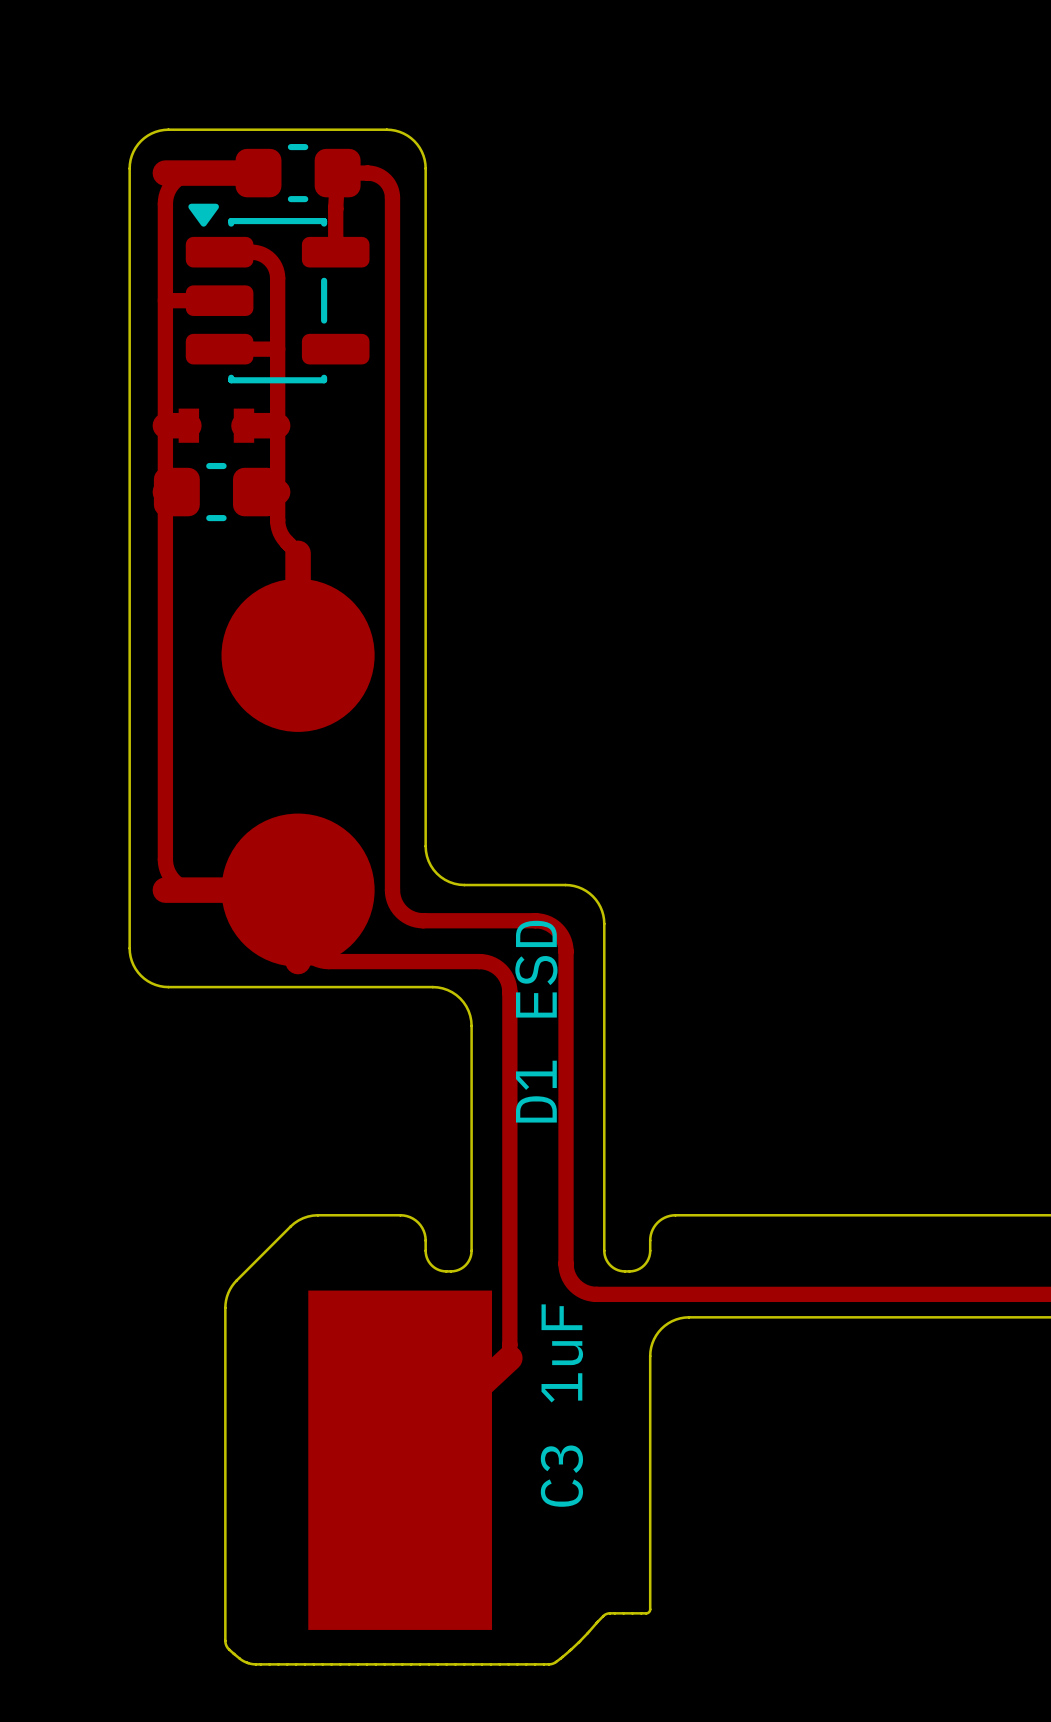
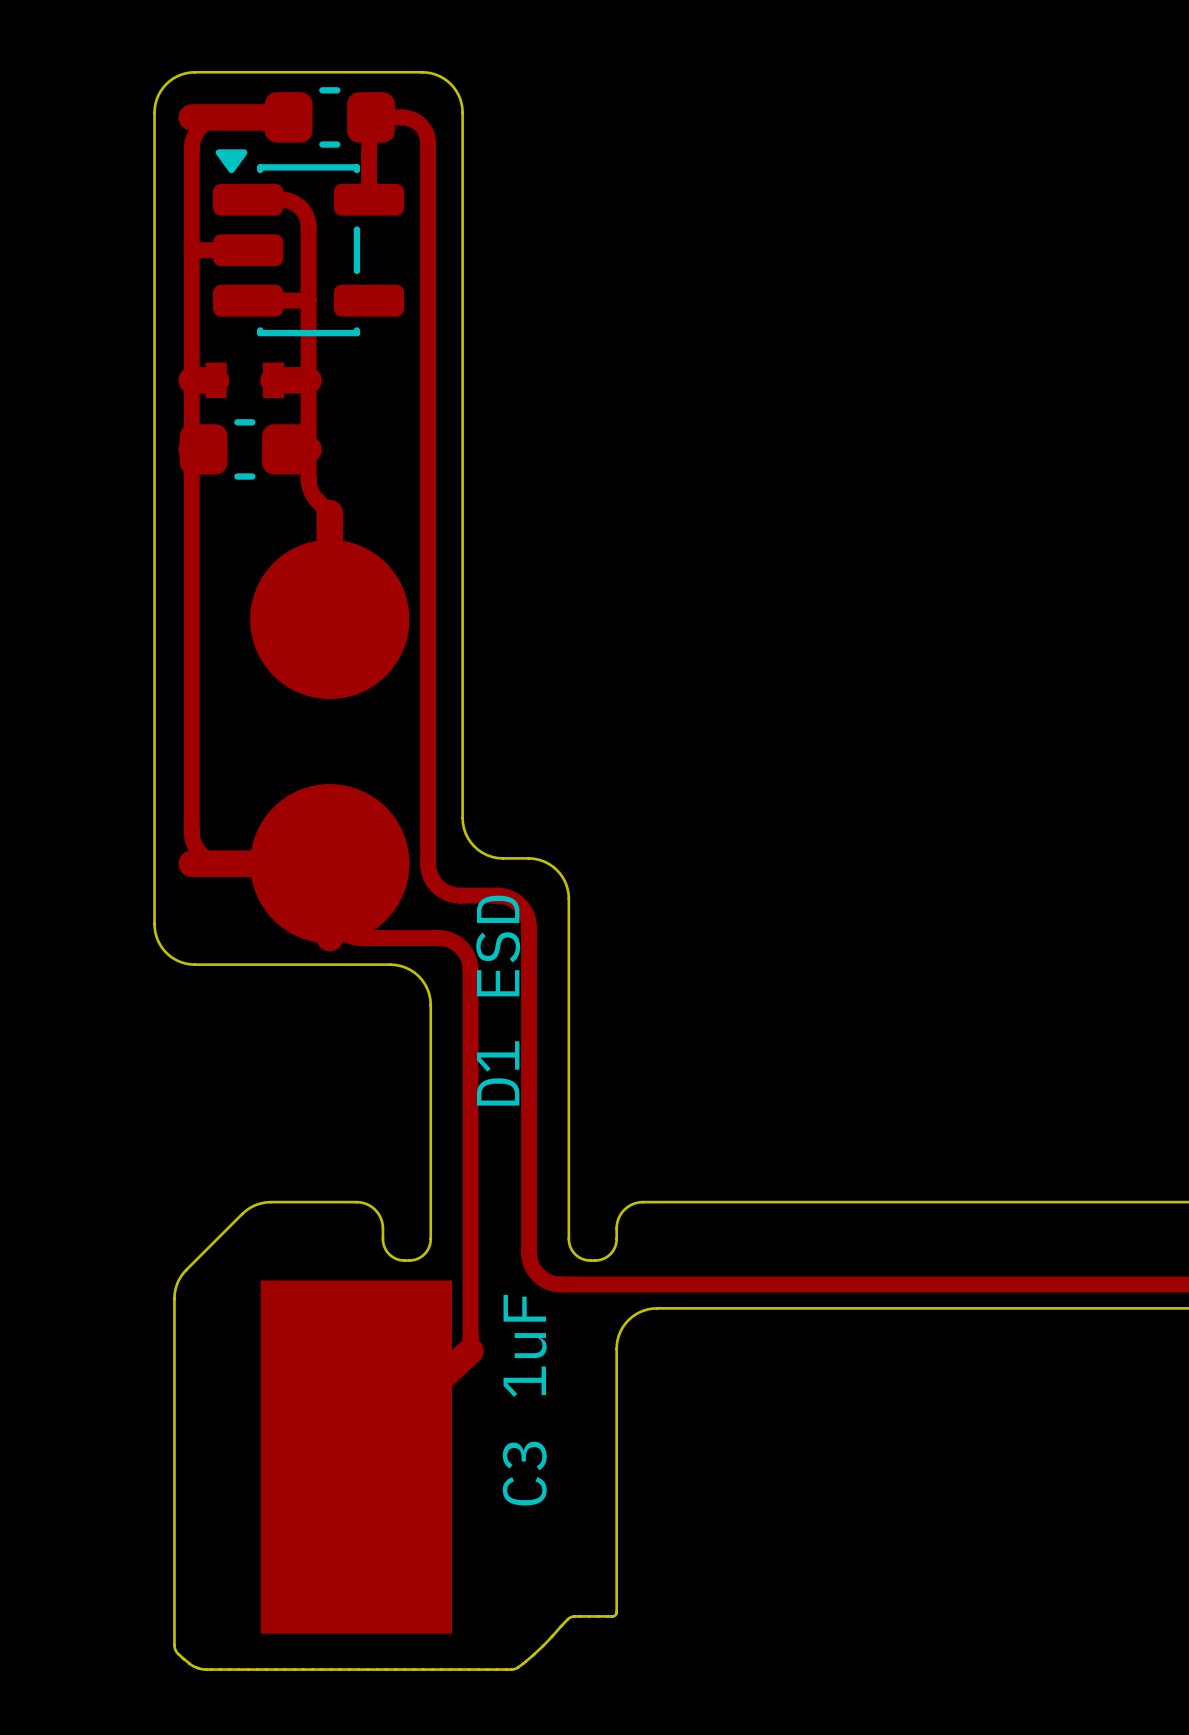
board edge: (488, 885) (569, 885) (586, 890) (598, 903) (604, 923) (604, 1250) (607, 1261) (613, 1268) (622, 1271) (634, 1270) (642, 1267) (649, 1256) (650, 1237) (654, 1227) (662, 1219) (675, 1215) -> (528, 858) (541, 860) (553, 867) (564, 881) (568, 894) (568, 1239) (572, 1250) (578, 1257) (587, 1260) (600, 1259) (608, 1256) (615, 1244) (619, 1217) (626, 1207) (634, 1203) (722, 1202)
track: (458, 920) (542, 921) (557, 929) (564, 941) (566, 951) (566, 1267) (570, 1280) (577, 1287) (586, 1292) (596, 1294) -> (497, 895) (510, 898) (519, 904) (525, 913) (528, 923) (529, 1252) (530, 1263) (538, 1275) (553, 1283) (640, 1284)
track: (402, 961) (486, 962) (500, 970) (509, 985) (509, 1344) (508, 1354) (502, 1365) (400, 1460) (509, 1358) -> (438, 938) (452, 941) (461, 947) (467, 956) (470, 966) (469, 1343) (466, 1352) (464, 1355) (462, 1357) (460, 1360) (356, 1457) (470, 1350)
board edge: (356, 987) (442, 988) (456, 995) (468, 1011) (471, 1025) (470, 1256) (467, 1263) (461, 1268) (453, 1271) (441, 1270) (435, 1268) (428, 1261) (425, 1253) (423, 1230) (418, 1222) (410, 1217) (400, 1215) (323, 1215) -> (390, 964) (405, 967) (418, 976) (425, 984) (430, 999) (430, 1239) (426, 1252) (419, 1257) (412, 1260) (399, 1260) (391, 1255) (384, 1246) (382, 1224) (379, 1215) (369, 1205) (356, 1202)
text position: D1 ESD (536, 1021) -> D1 ESD (498, 1000)
board edge: (317, 1215) (303, 1218) (290, 1226) (234, 1283) (228, 1293) (225, 1304) (225, 1642) (228, 1648) (241, 1659) (255, 1664) -> (350, 1202) (270, 1202) (250, 1207) (183, 1272) (177, 1283) (174, 1294) (175, 1648) (189, 1663) (202, 1669) (285, 1669)
board edge: (689, 1317) (676, 1319) (664, 1325) (656, 1335) (650, 1351) (649, 1611) (646, 1613) (605, 1614) (571, 1649) (552, 1663) (472, 1664) -> (736, 1308) (652, 1308) (635, 1314) (622, 1327) (617, 1339) (616, 1348) (616, 1613) (613, 1616) (570, 1617) (533, 1654) (517, 1667) (511, 1669)
text position: C3 1uF (561, 1405) -> C3 1uF (524, 1400)
part position: (400, 1460) -> (356, 1457)

